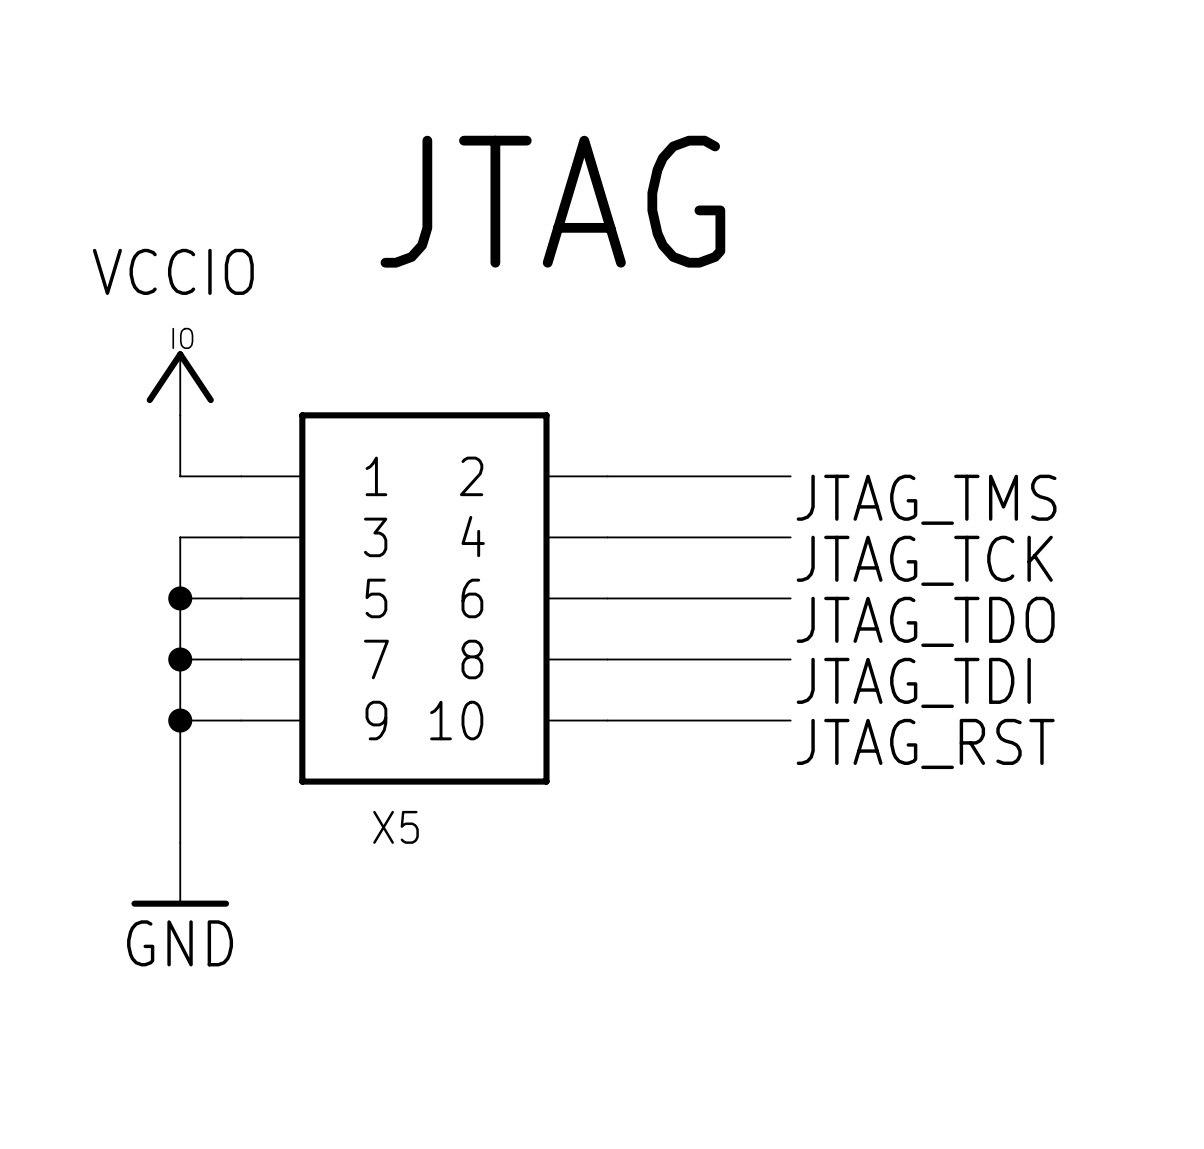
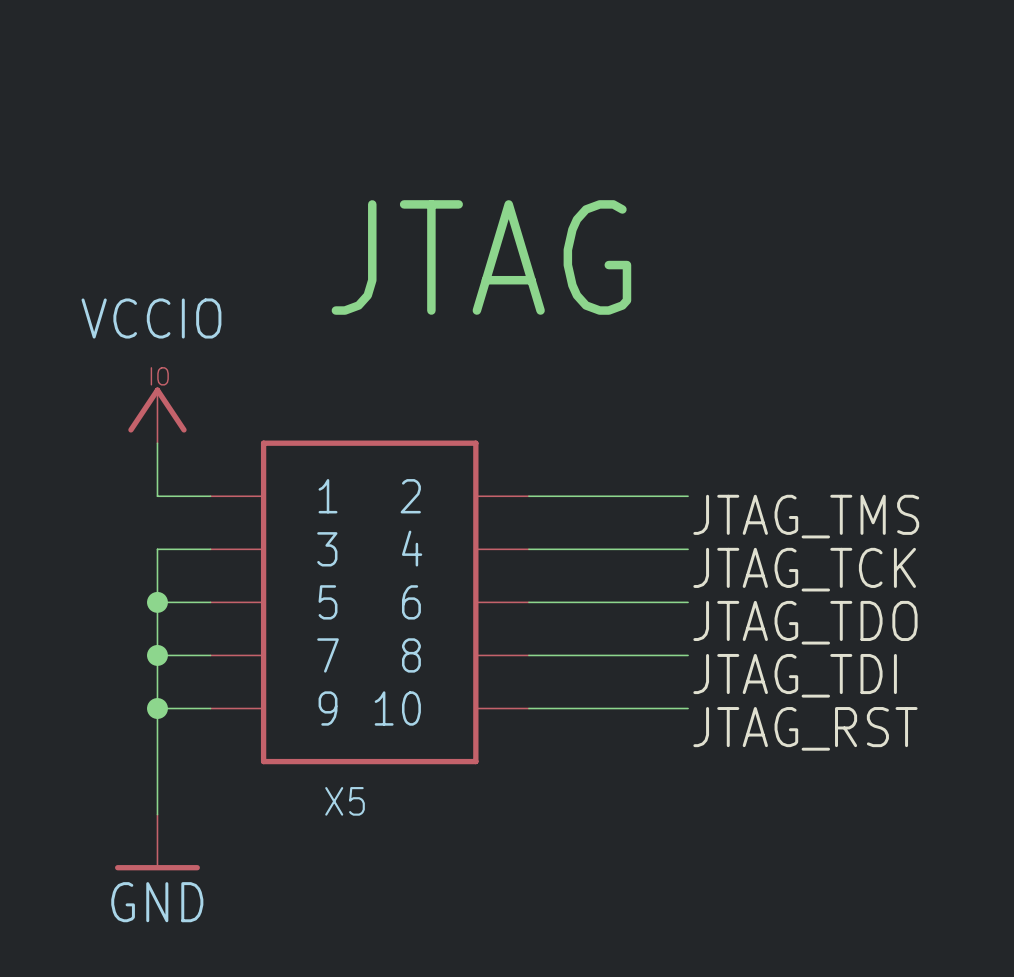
text position: JTAG (552, 201) -> JTAG (481, 257)
power symbol position: VCCIO (180, 383) -> VCCIO (157, 415)
wire: (180, 415) (180, 476) (241, 476) -> none
wire: (607, 476) (790, 476) -> (528, 708) (688, 708)
label: JTAG_TMS (926, 499) -> none
wire: (180, 537) (241, 537) -> (157, 655) (210, 655)
wire: (607, 537) (790, 537) -> (528, 655) (688, 655)
label: JTAG_TCK (924, 560) -> none
wire: (180, 598) (180, 659) -> none
junction: (180, 598) -> none
X5 position: (424, 598) -> (369, 602)
label: JTAG_TDO (925, 621) -> JTAG_TMS (806, 516)
junction: (180, 659) -> none
label: JTAG_TDI (913, 682) -> JTAG_TCK (804, 569)
label: JTAG_RST (925, 743) -> JTAG_TDO (805, 622)
junction: none -> (157, 655)
label: none -> JTAG_TDI (795, 675)
junction: none -> (157, 708)
wire: none -> (210, 708) (157, 708) (157, 814)
label: none -> JTAG_RST (805, 728)
power symbol position: GND (180, 874) -> GND (157, 842)

